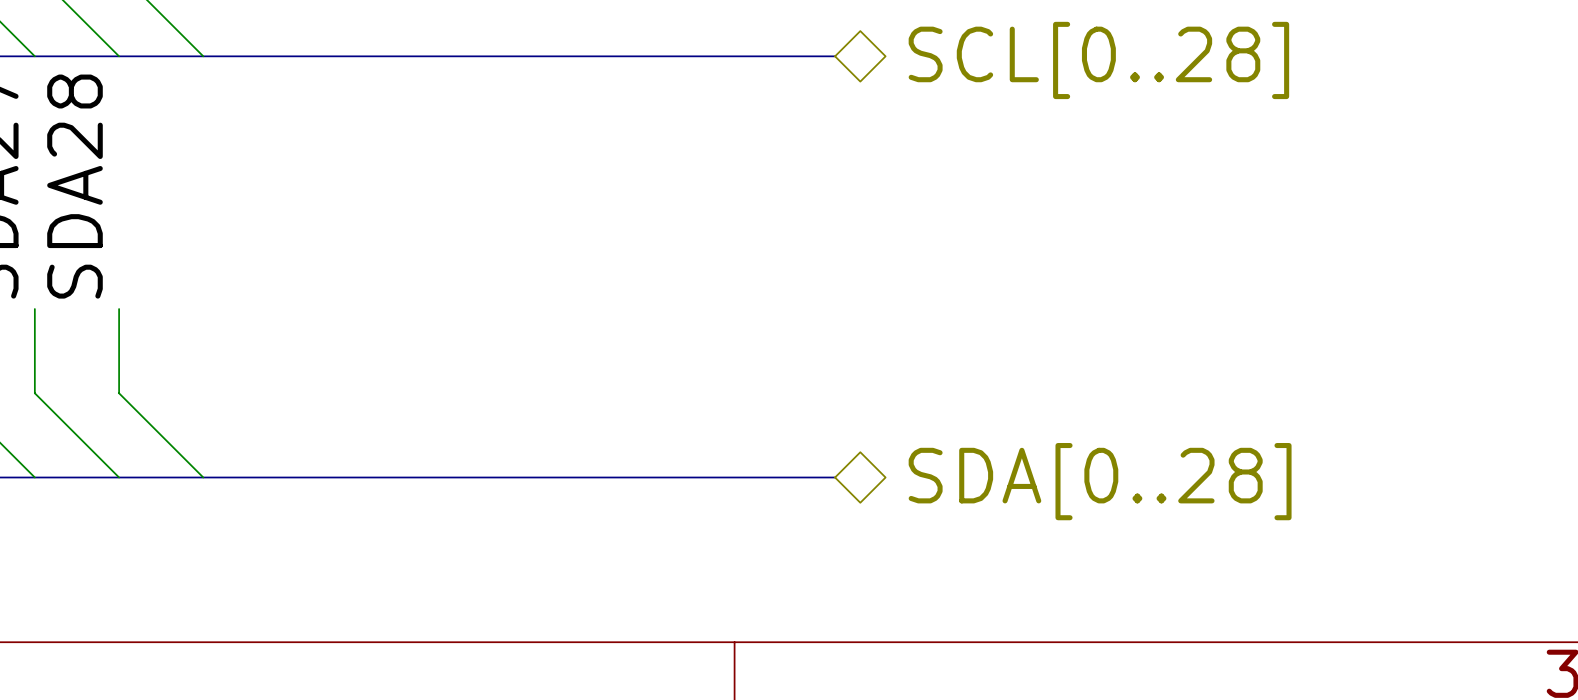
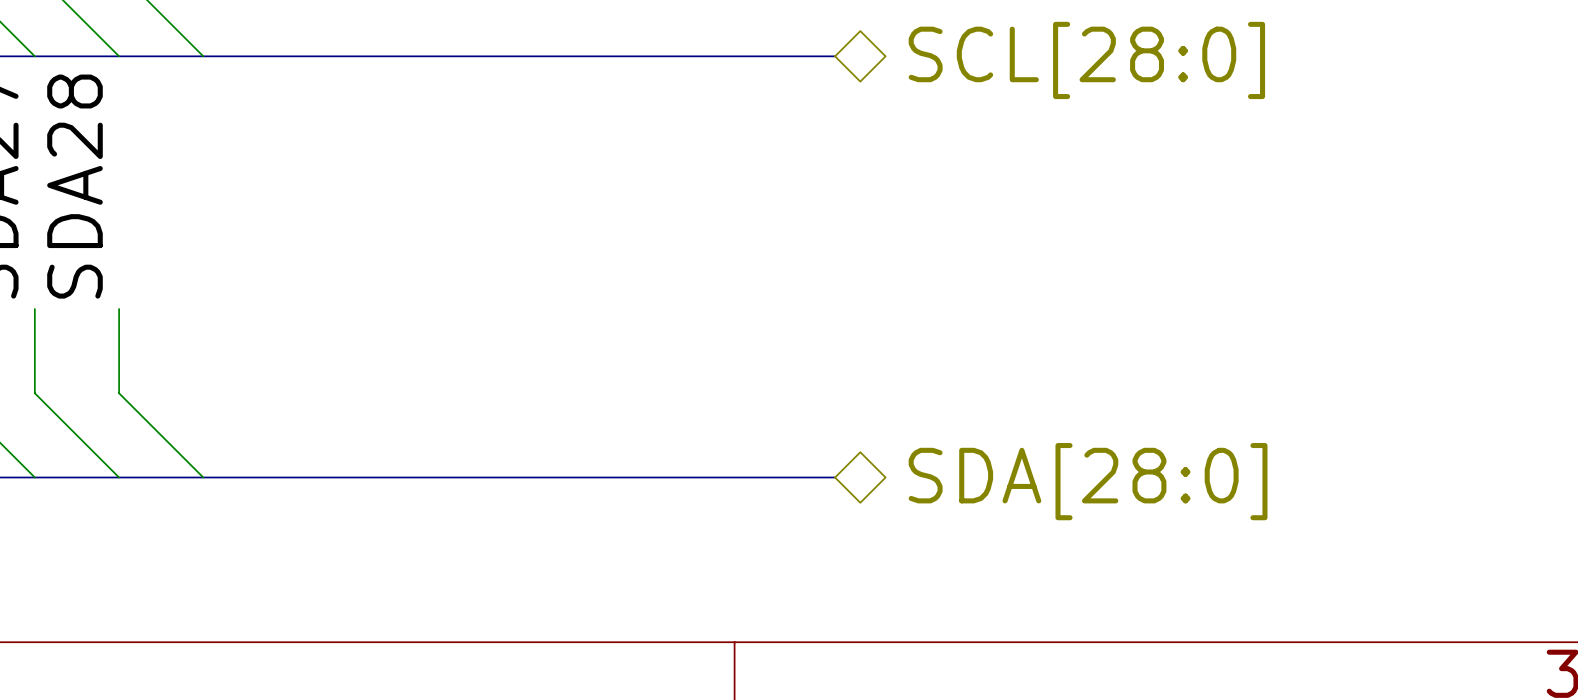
hierarchical label: SCL[0..28] (1098, 60) -> SCL[28:0] (1086, 60)
hierarchical label: SDA[0..28] (1100, 481) -> SDA[28:0] (1088, 481)

